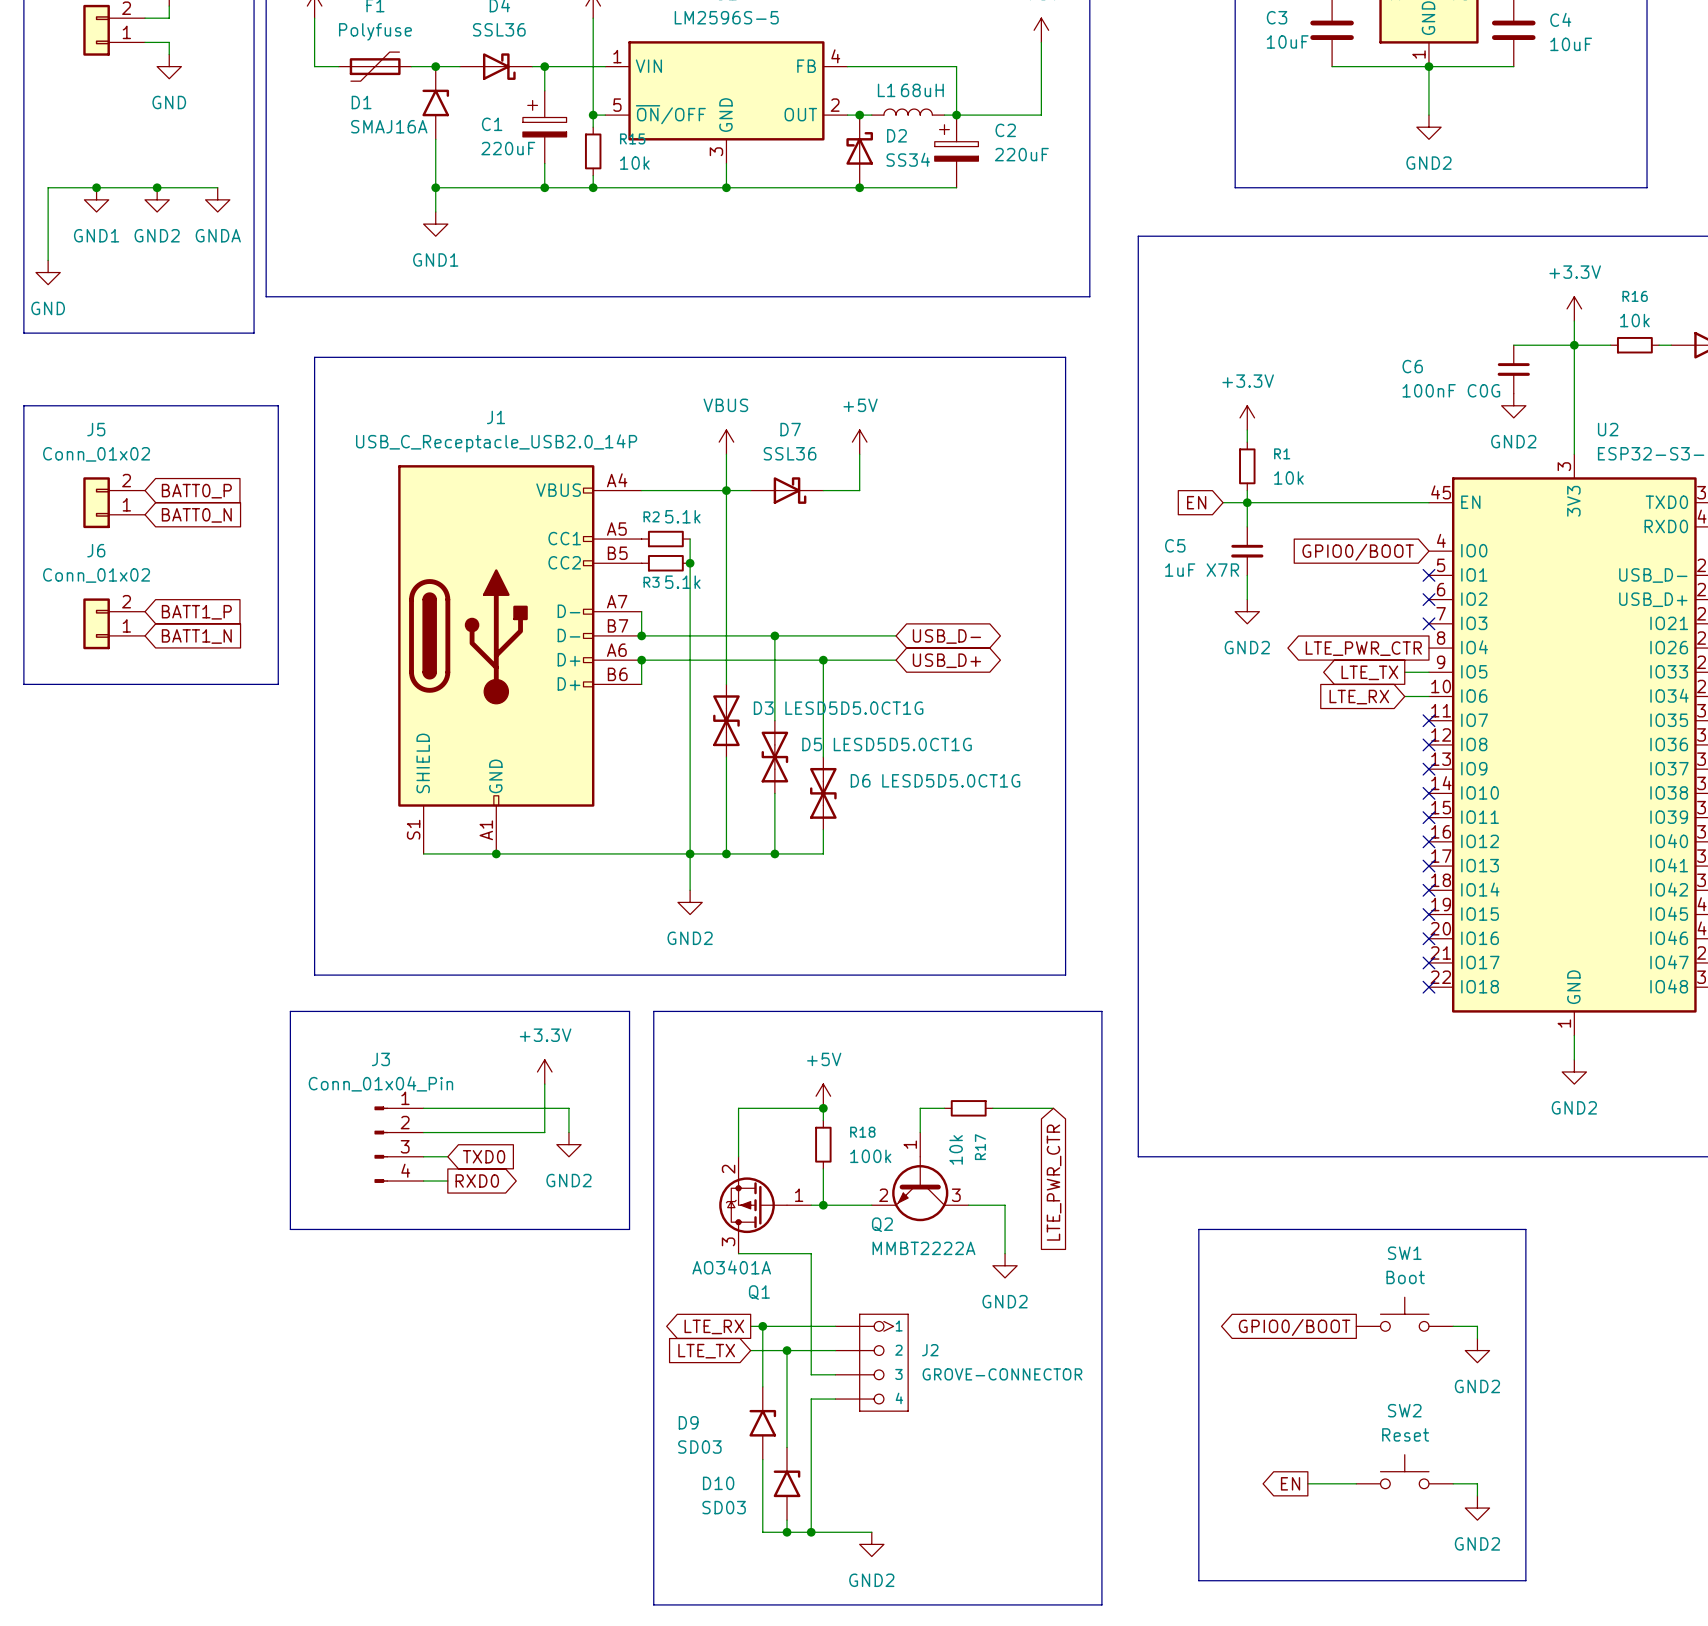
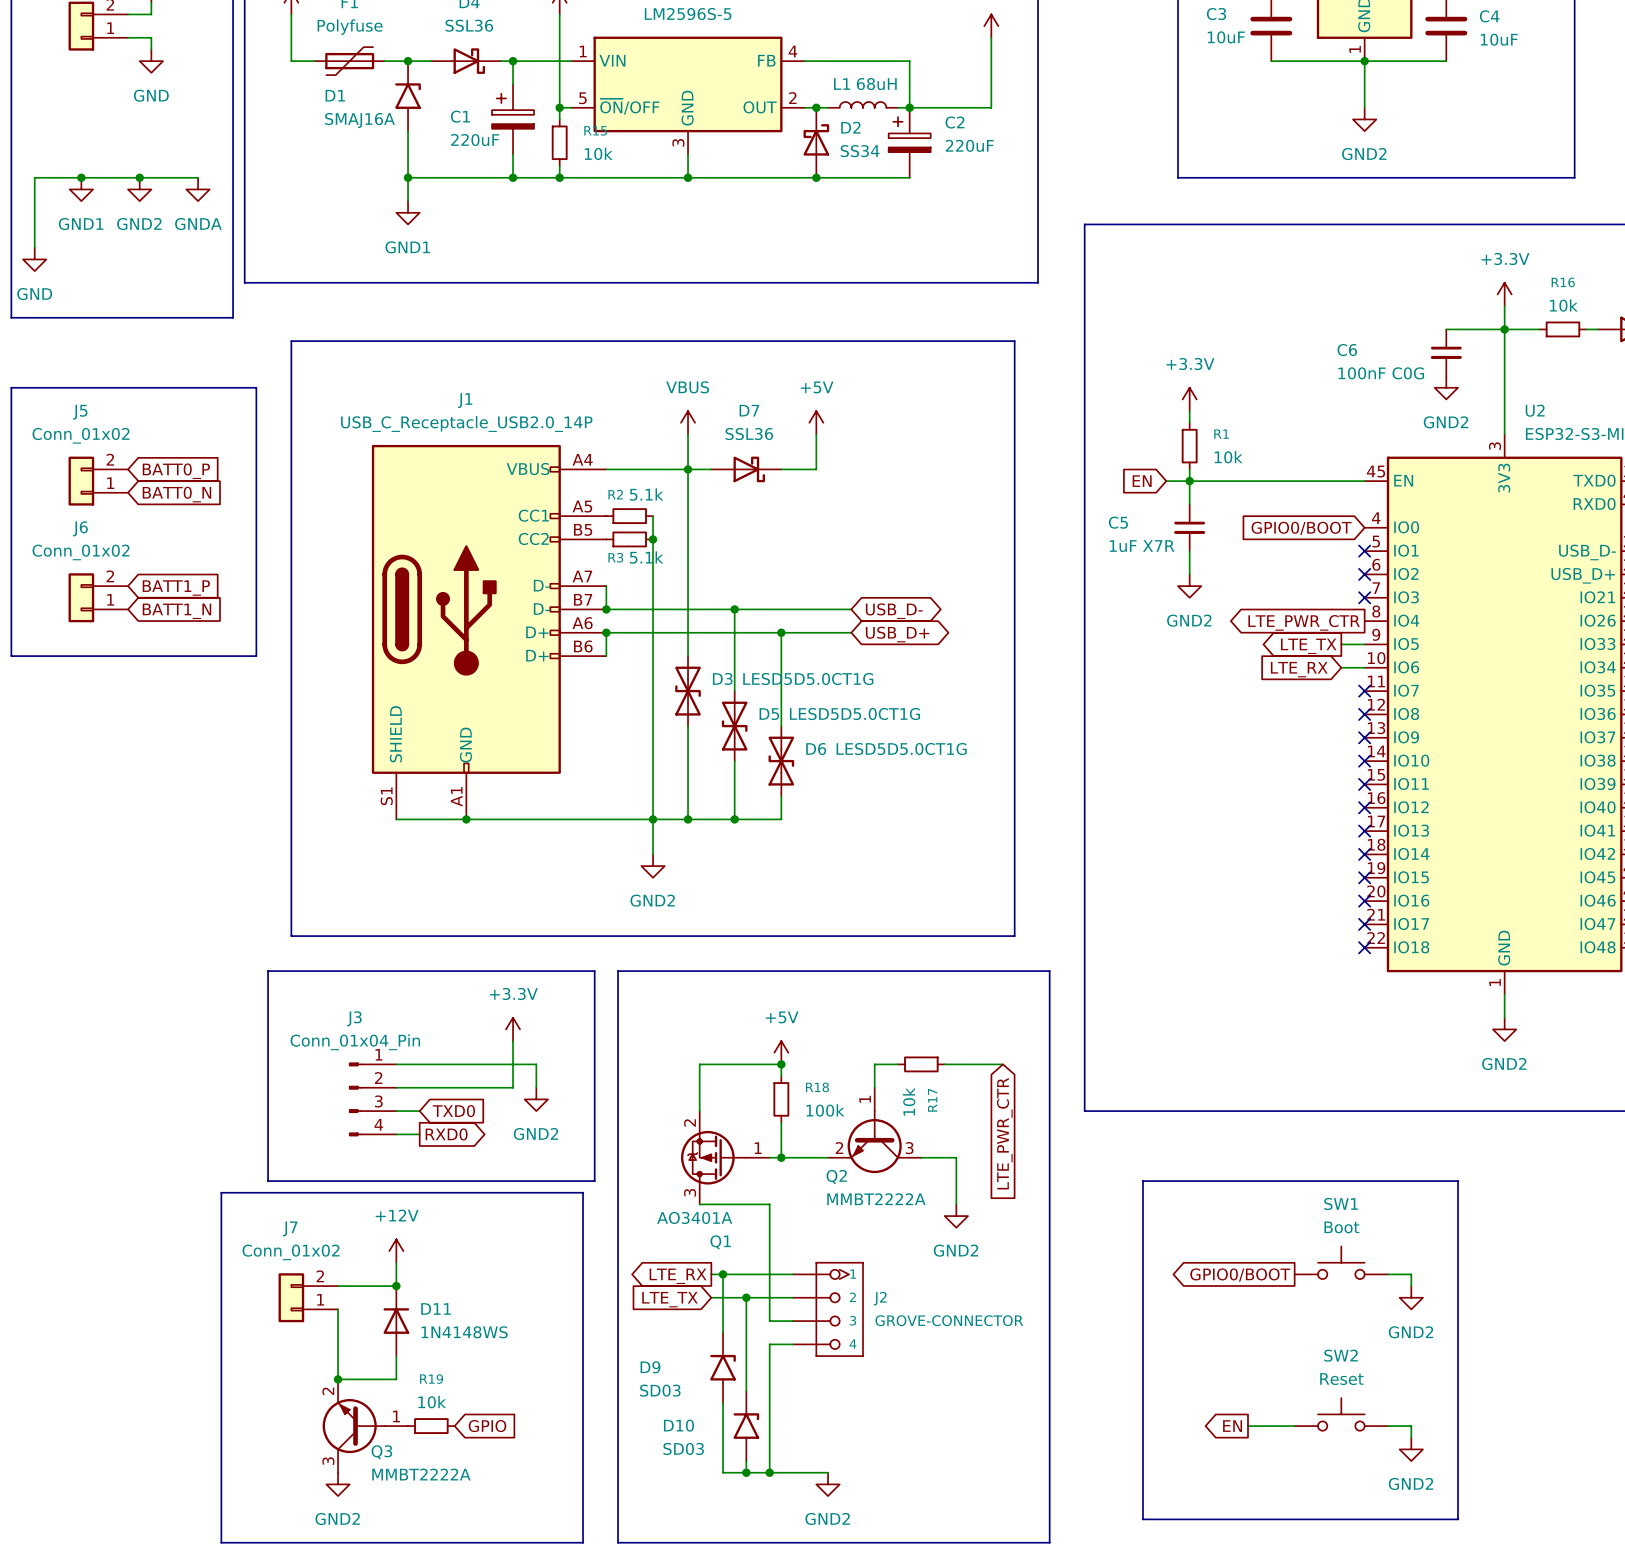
line: none -> (221, 1192) (583, 1192) (583, 1542) (221, 1542) (221, 1192)
power symbol: none -> +12V (396, 1251)
wire: none -> (396, 1262) (396, 1286) (338, 1286)
junction: none -> (396, 1286)
J7: none -> Conn_01x02 (308, 1297)
wire: none -> (338, 1309) (338, 1379) (396, 1379) (396, 1356)
D11: none -> 1N4148WS (396, 1321)
junction: none -> (338, 1379)
Q3: none -> MMBT2222A (365, 1426)
R19: none -> 10k (431, 1426)
global label: none -> GPIO (487, 1426)
power symbol: none -> GND2 (338, 1484)

